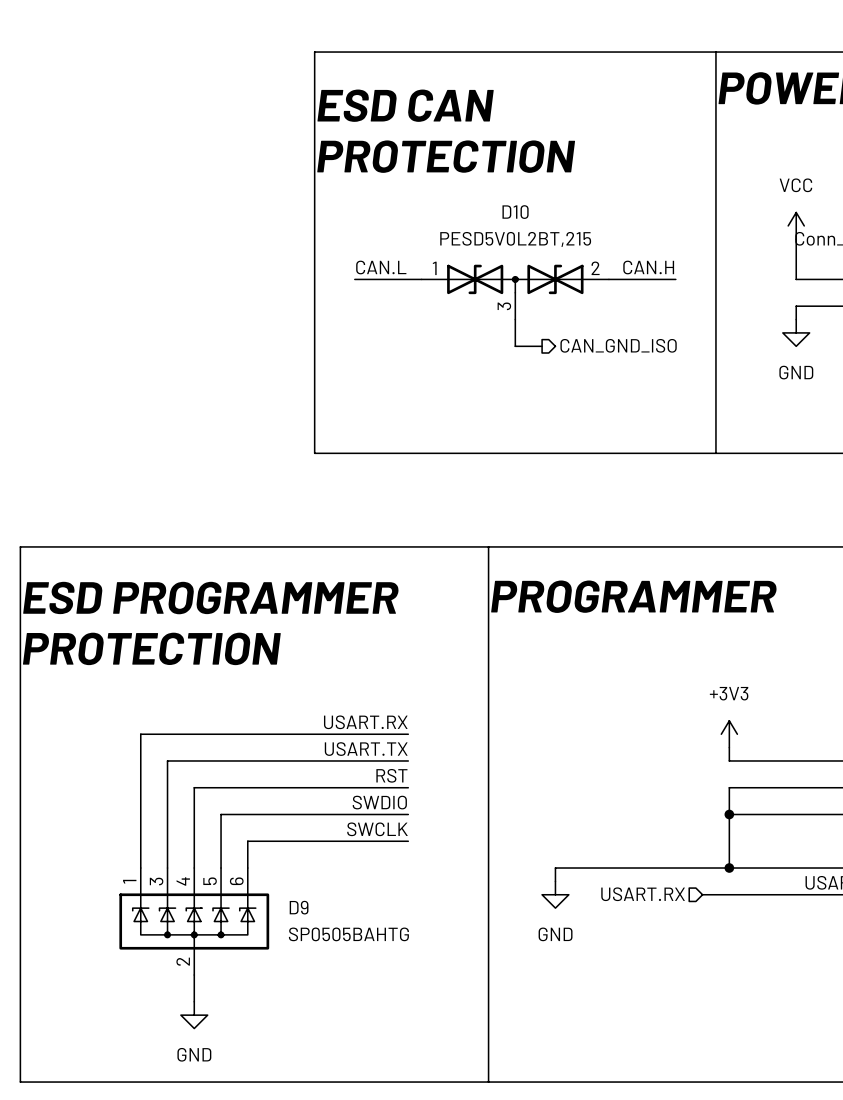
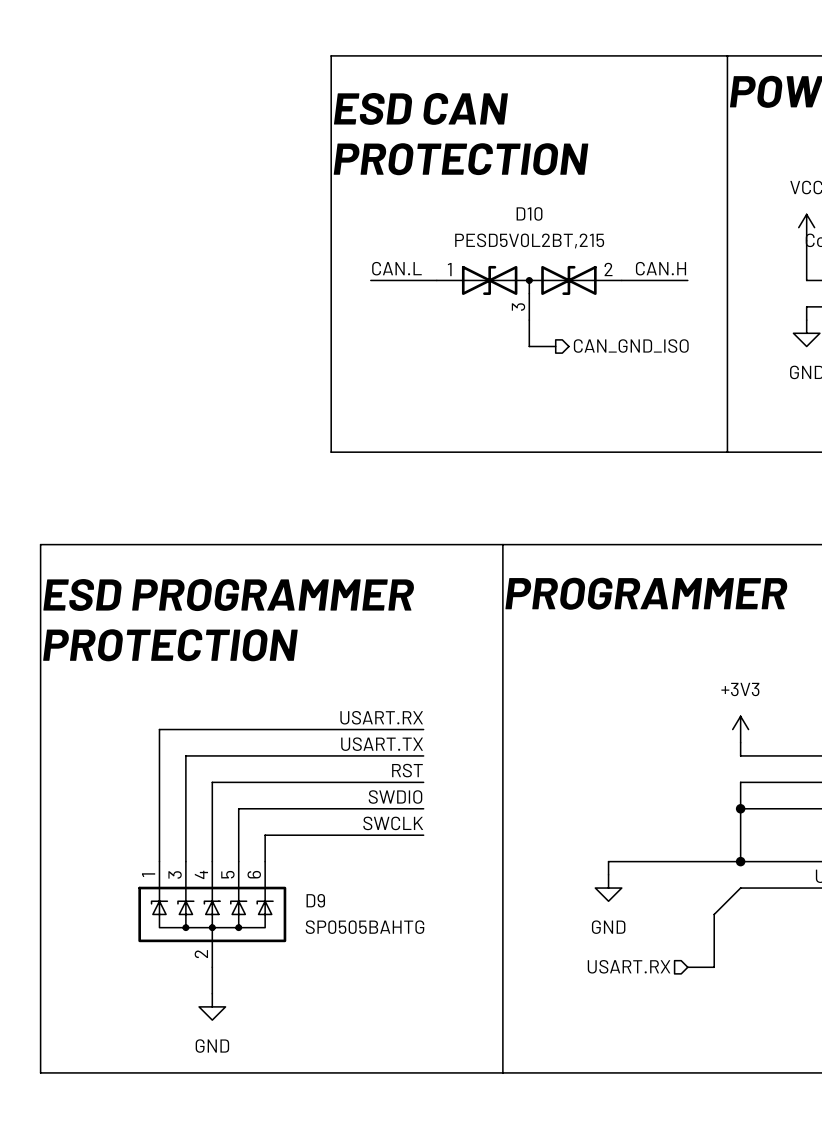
wire: (595, 868) (555, 868) (555, 881) -> (608, 861) (608, 874)
power symbol position: GND (555, 894) -> GND (608, 888)
hierarchical label position: USART.RX (643, 894) -> USART.RX (629, 966)
wire: (702, 894) (729, 894) -> (687, 967) (714, 967) (714, 914) (740, 888)

